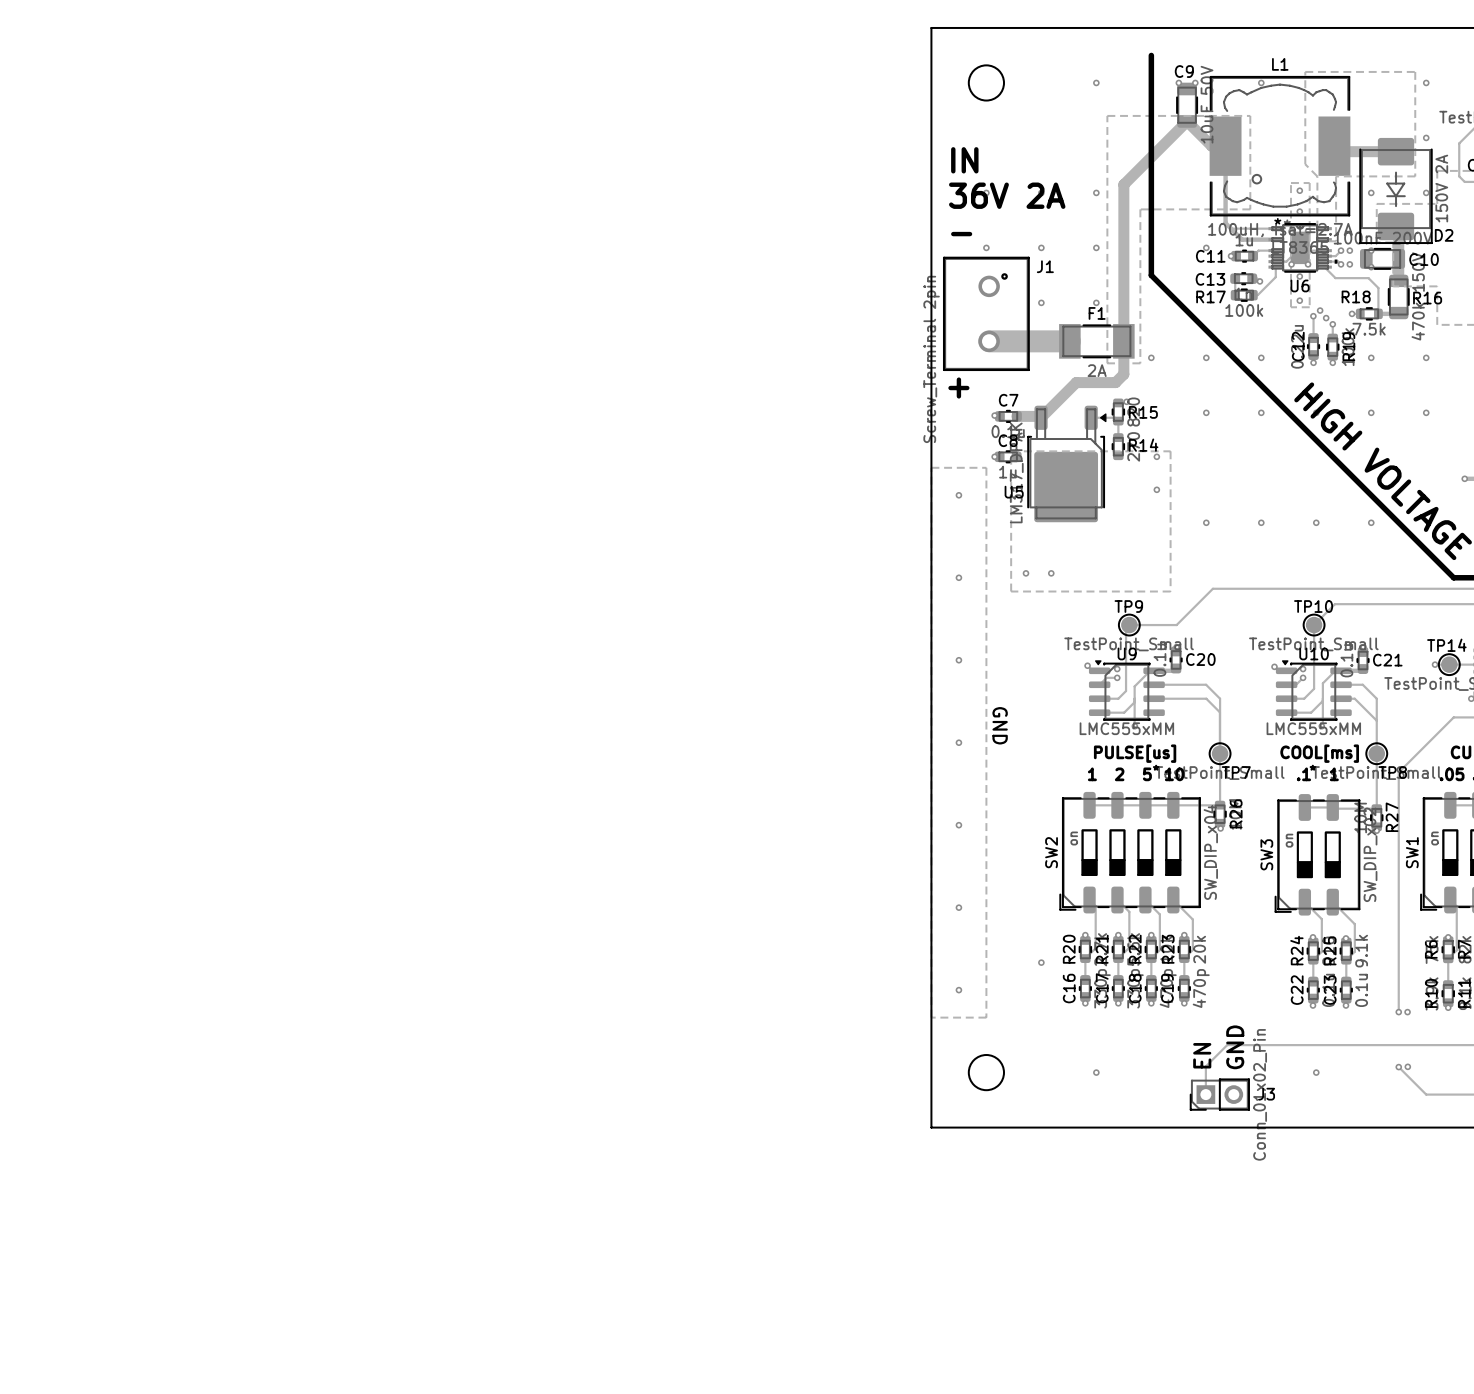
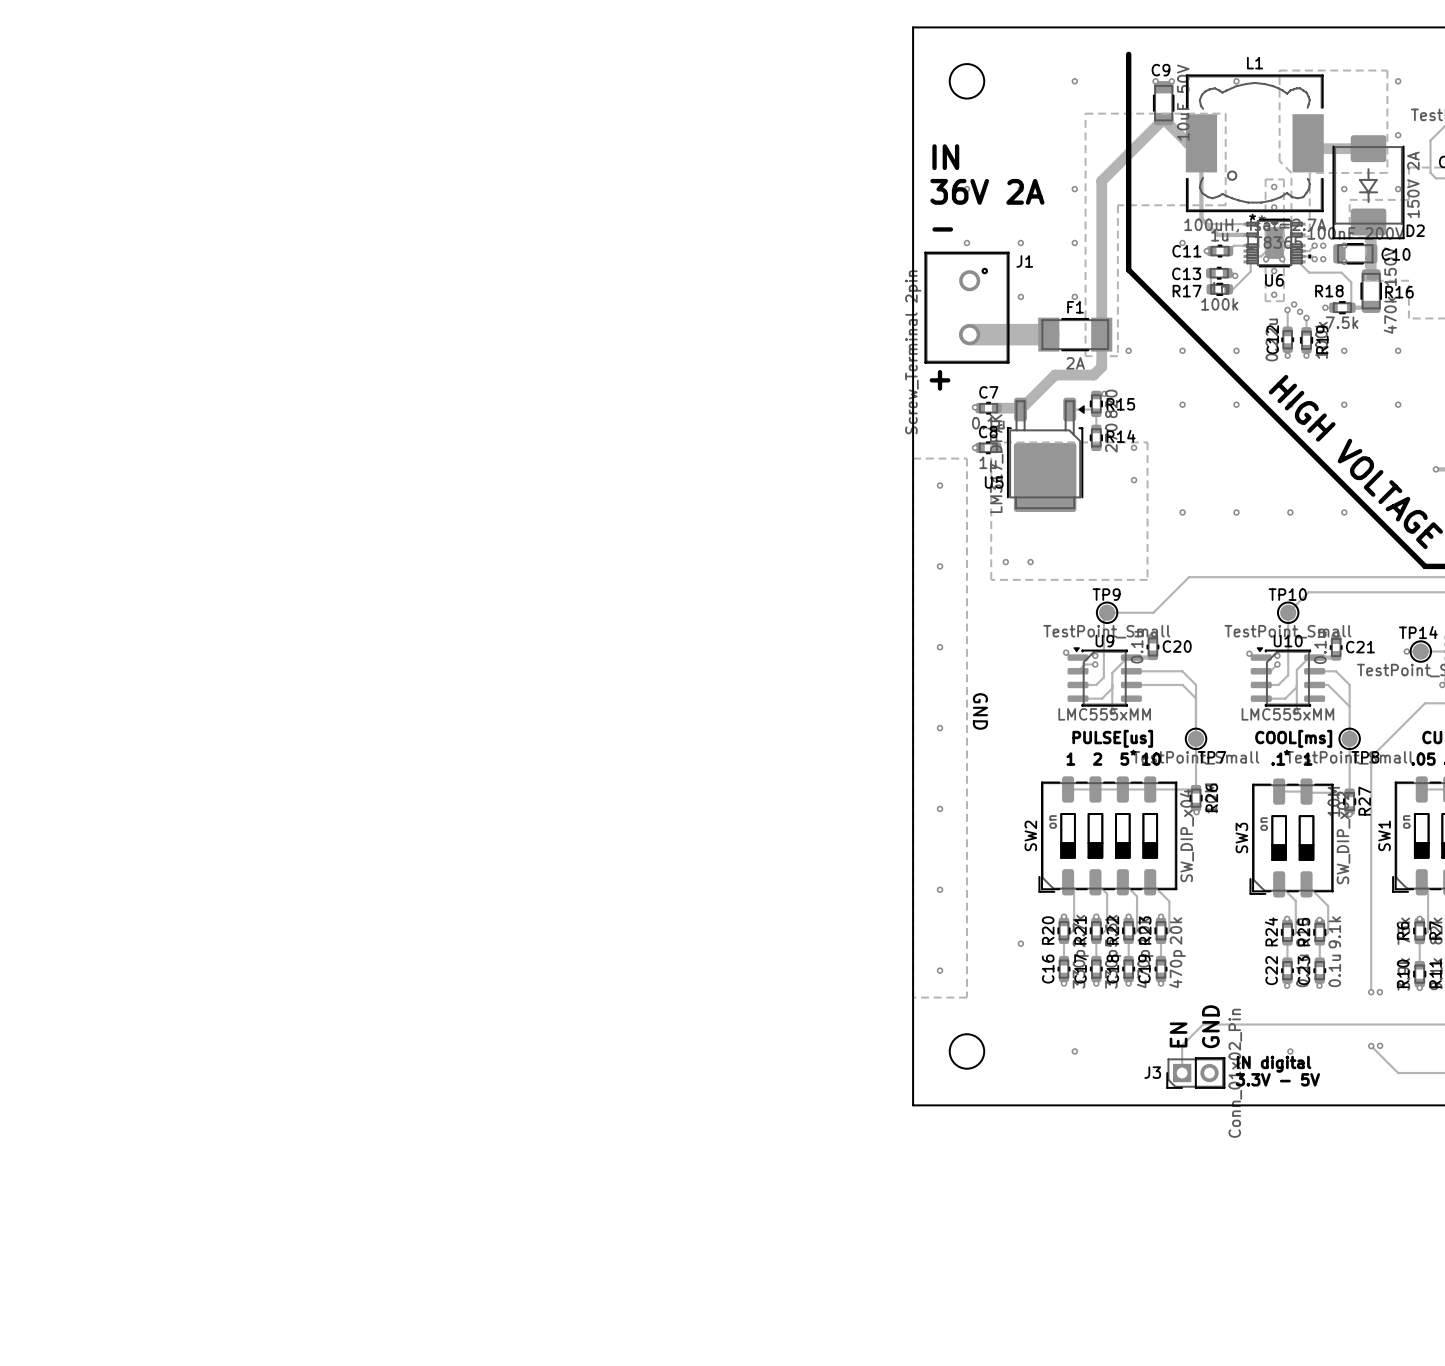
text: none -> IN digital (1274, 1064)
J3 name position: J3 (1266, 1094) -> J3 (1152, 1072)
text: none -> 3.3V - 5V (1277, 1079)

